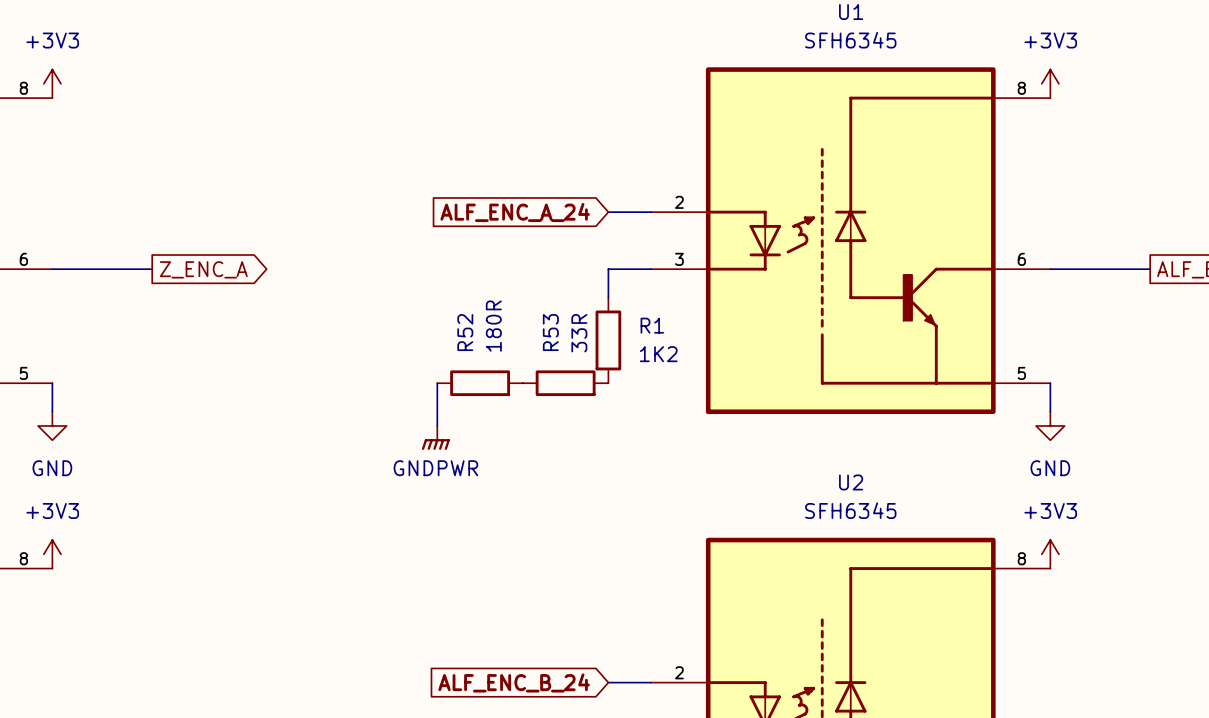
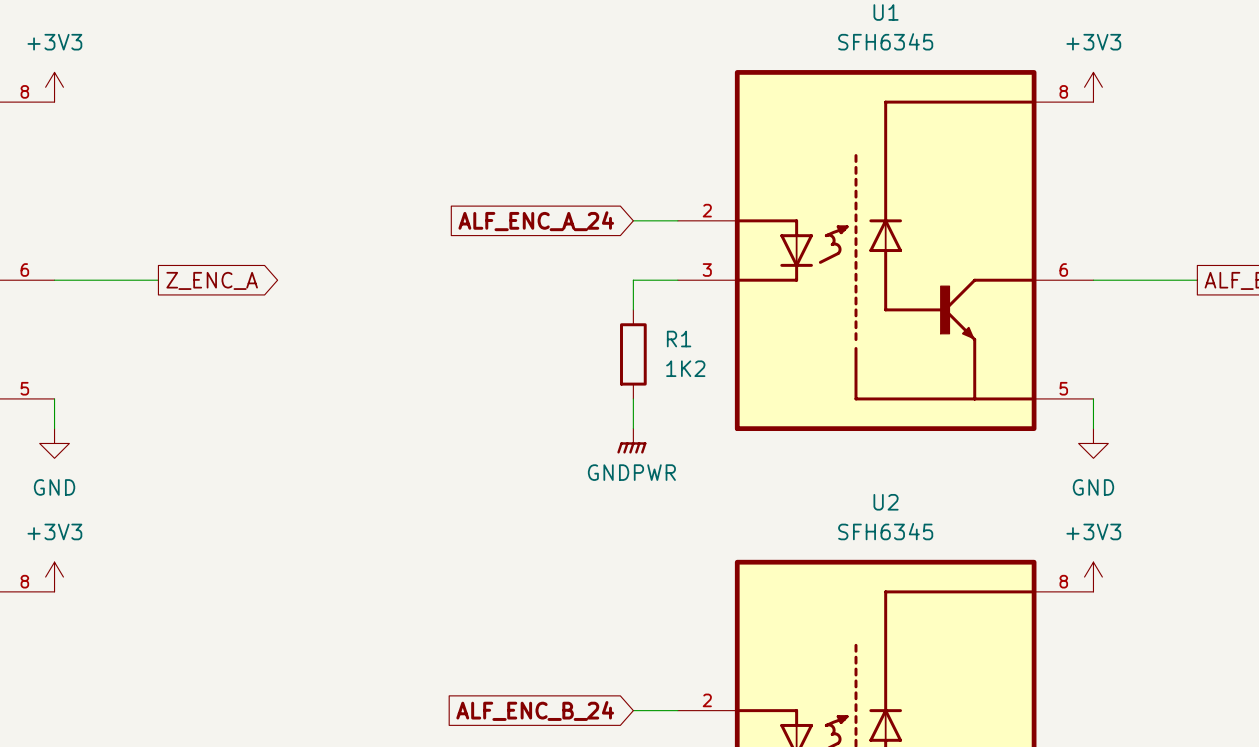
wire: (437, 383) (437, 425) -> none
R52: 180R (480, 383) -> none
R53: 33R (565, 383) -> none
wire: none -> (633, 398) (633, 428)
power symbol position: GNDPWR (435, 437) -> GNDPWR (631, 441)

